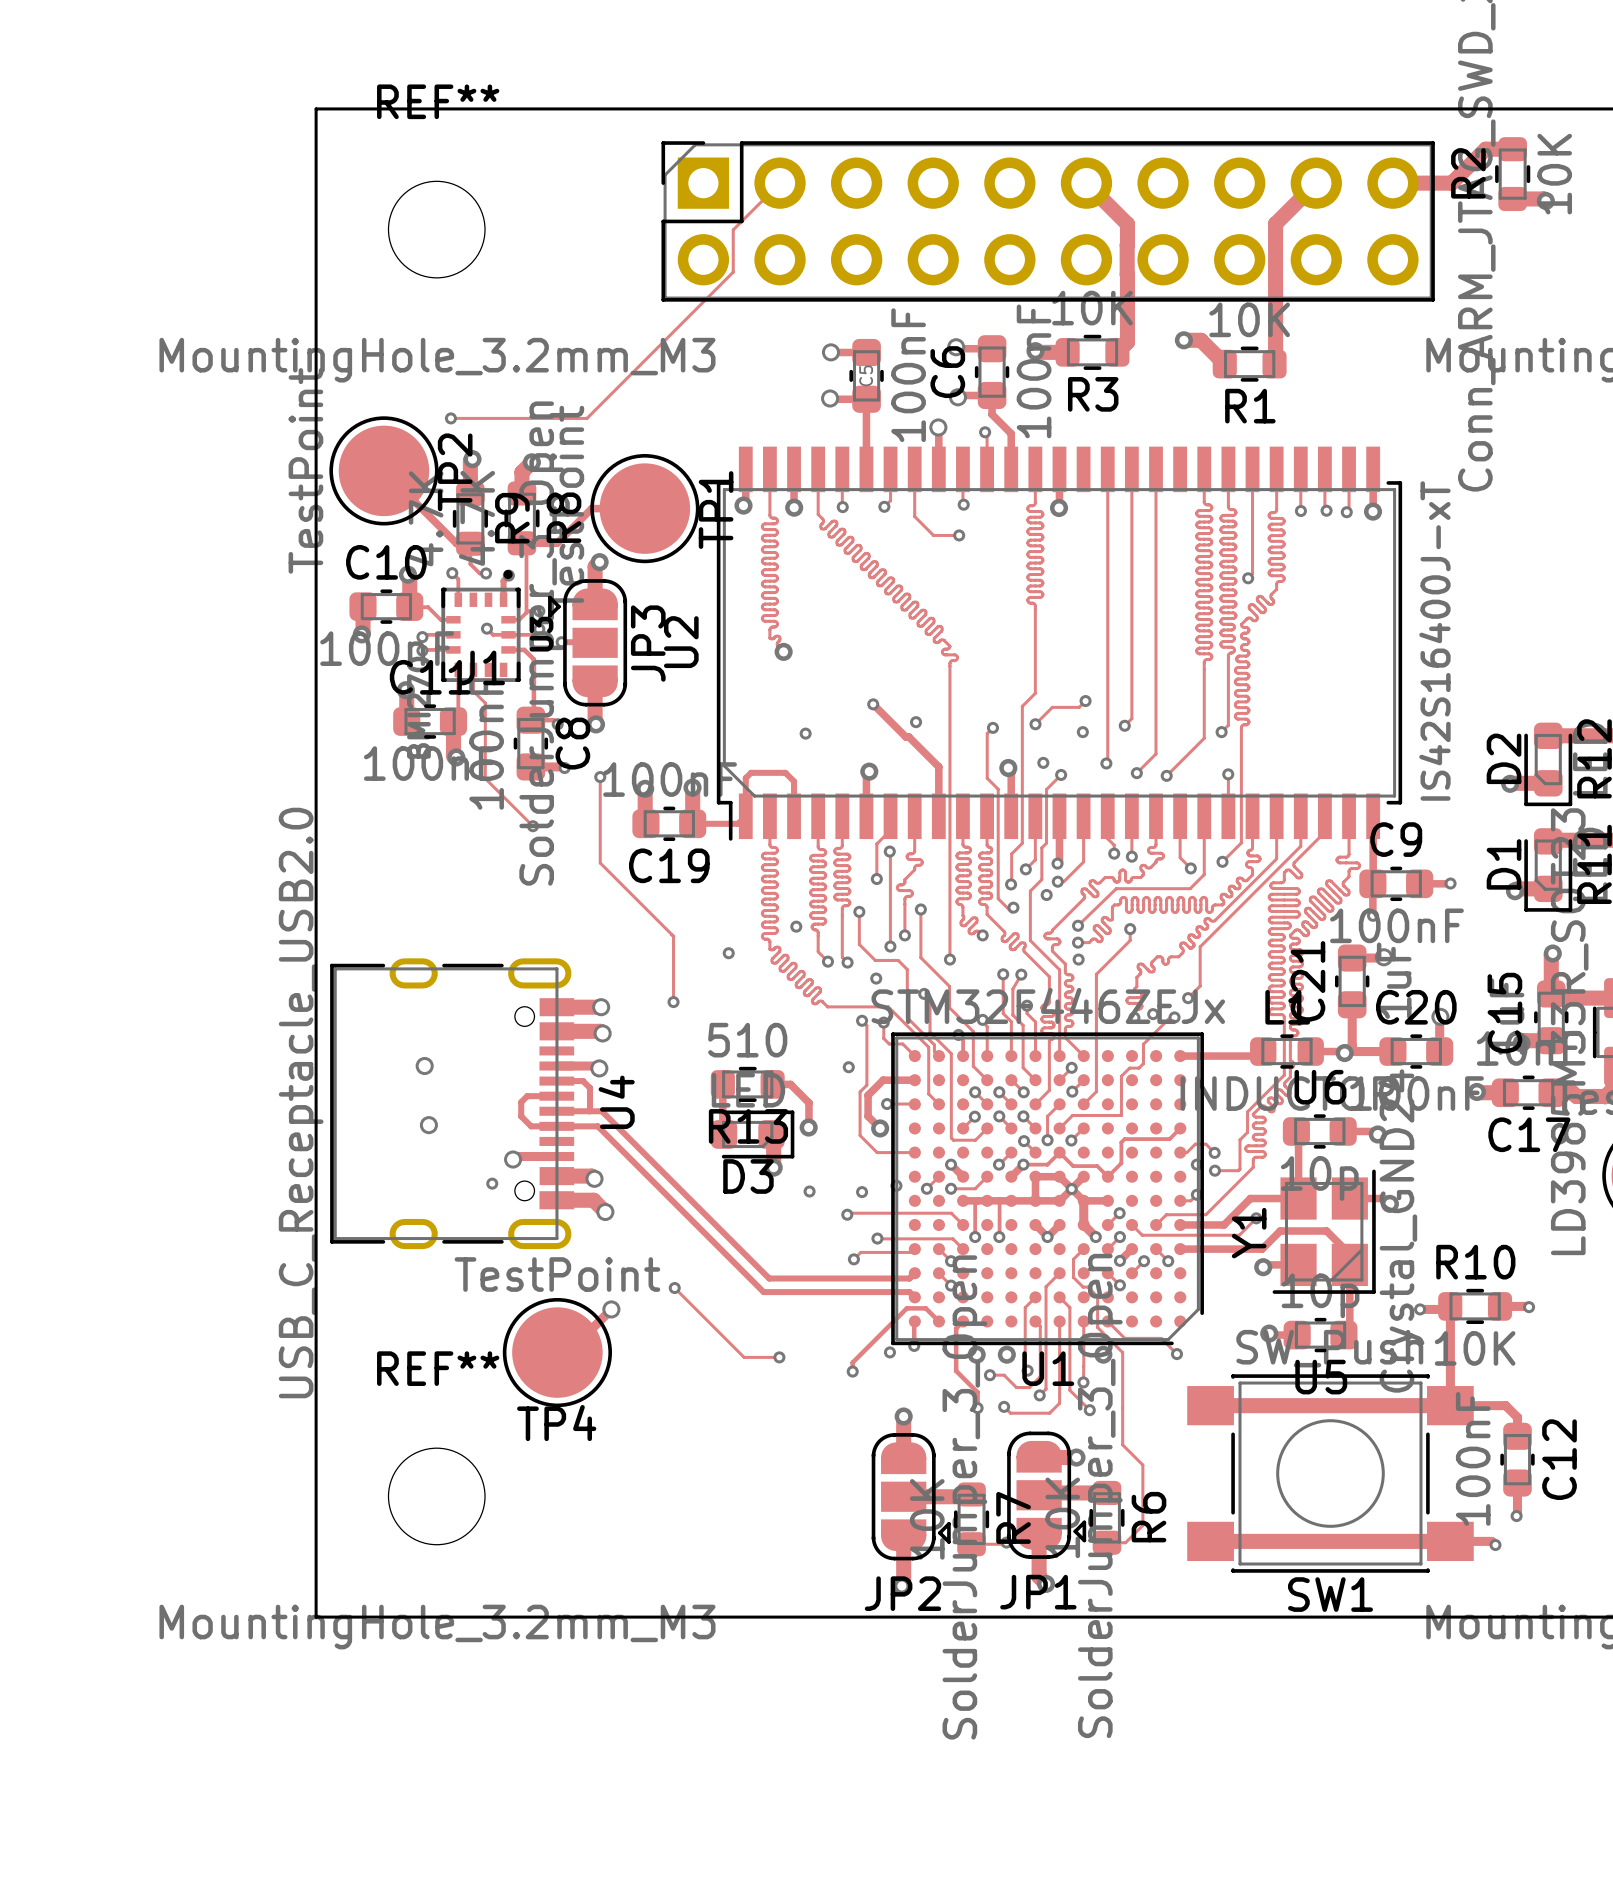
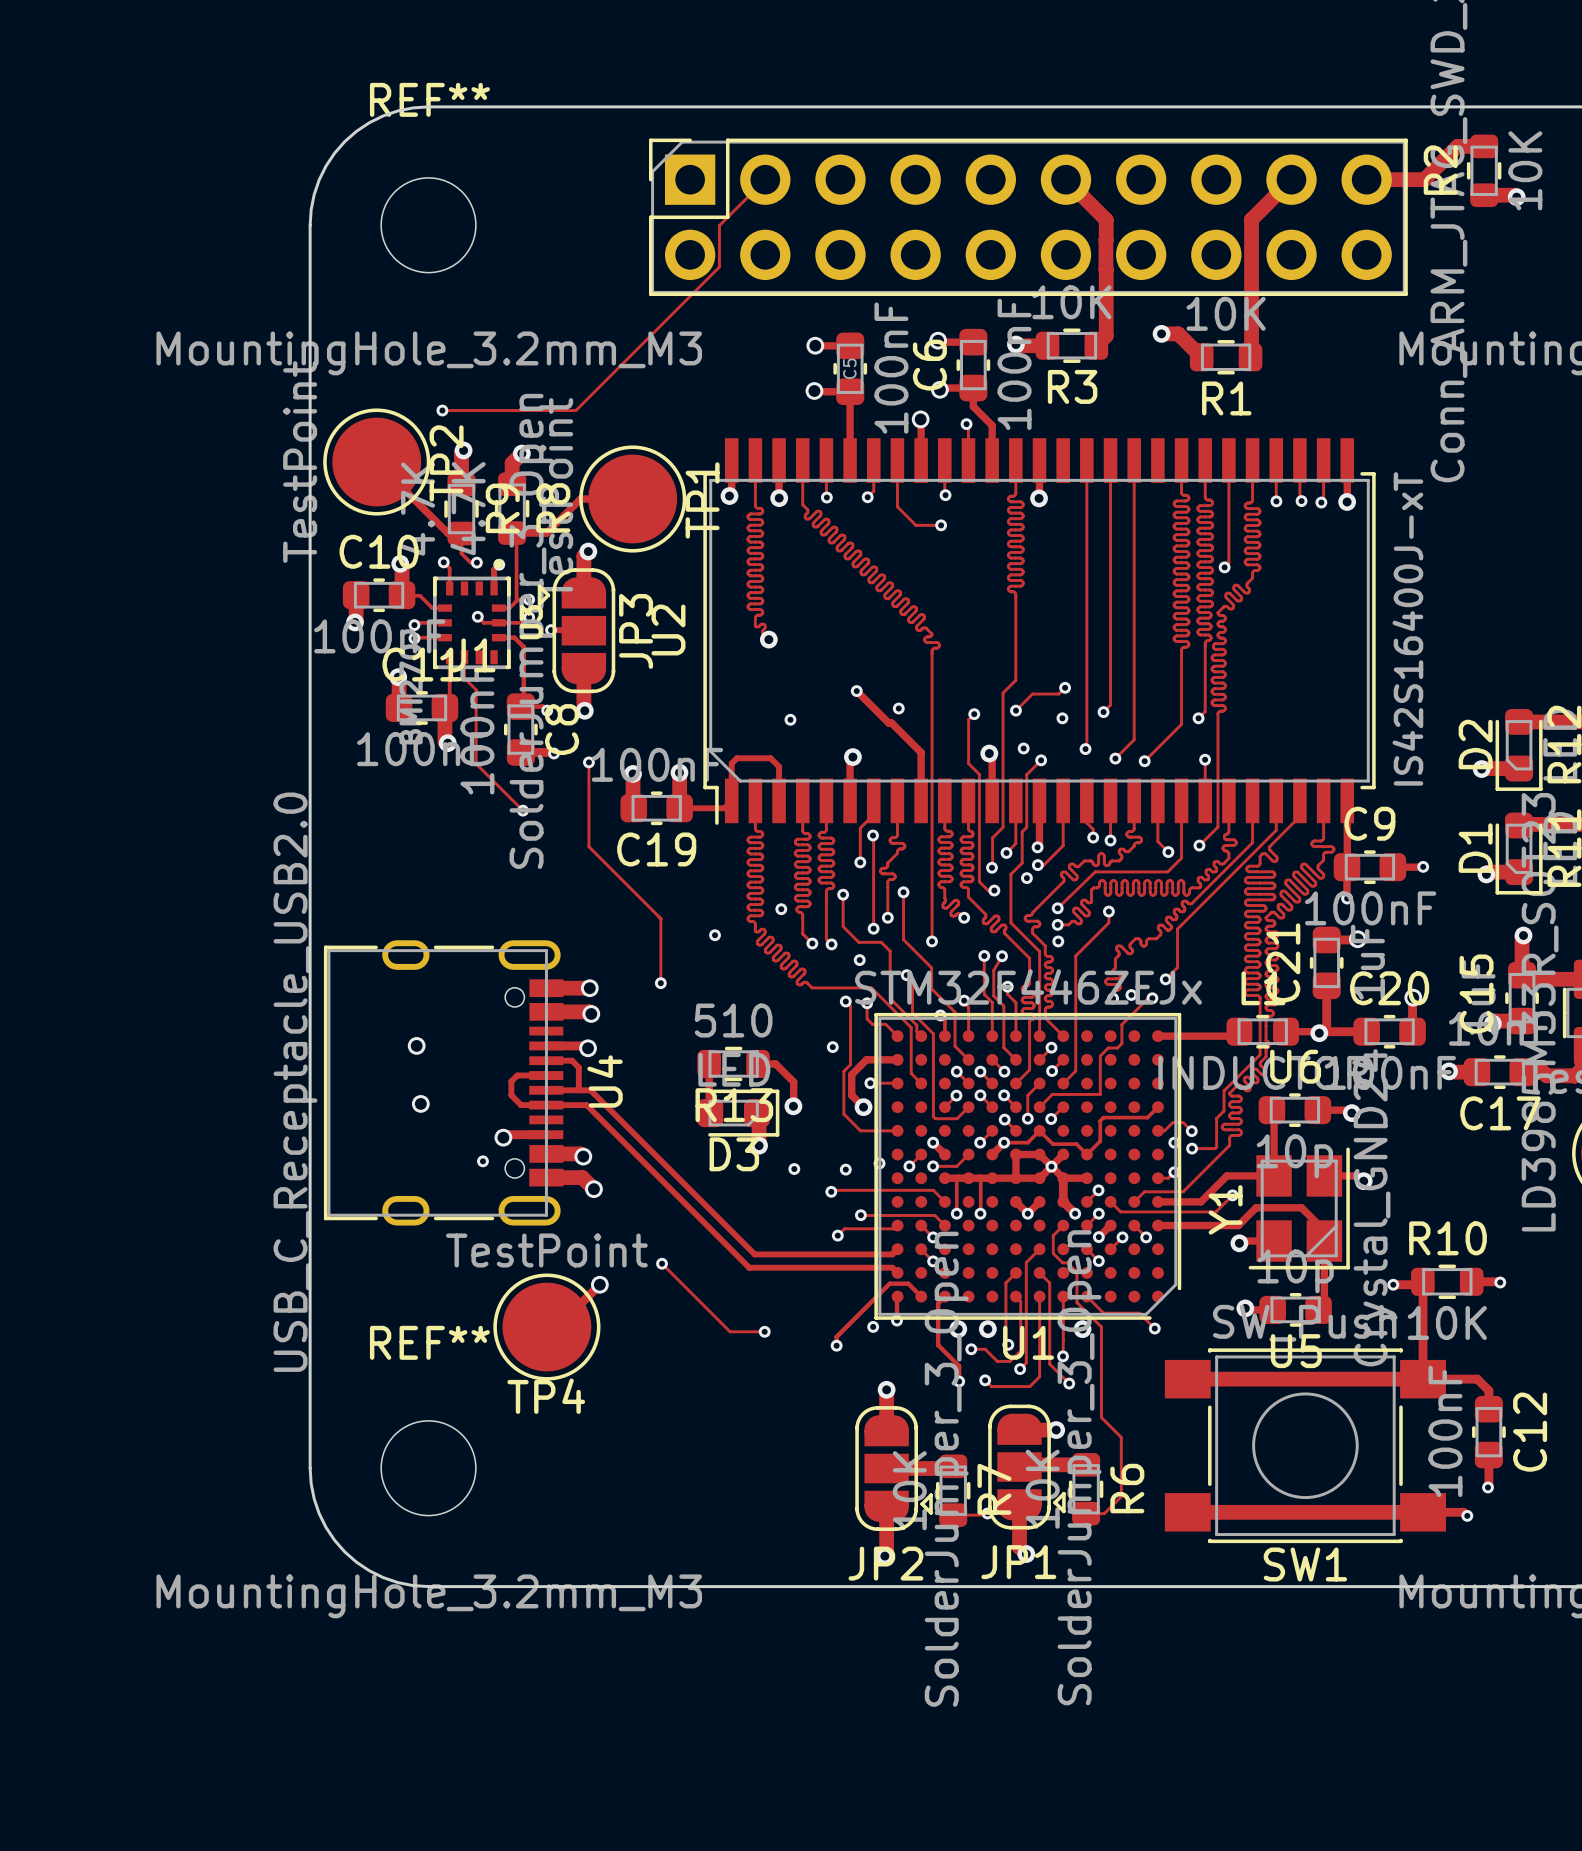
board edge: (436, 108) (316, 108) (316, 229) -> (428, 106) (413, 107) (383, 115) (369, 122) (344, 141) (326, 166) (319, 179) (314, 194) (310, 225)
board edge: (316, 1496) (316, 1617) (436, 1617) -> (310, 1468) (314, 1498) (319, 1513) (334, 1540) (344, 1551) (356, 1562) (383, 1577) (413, 1585) (428, 1586)

